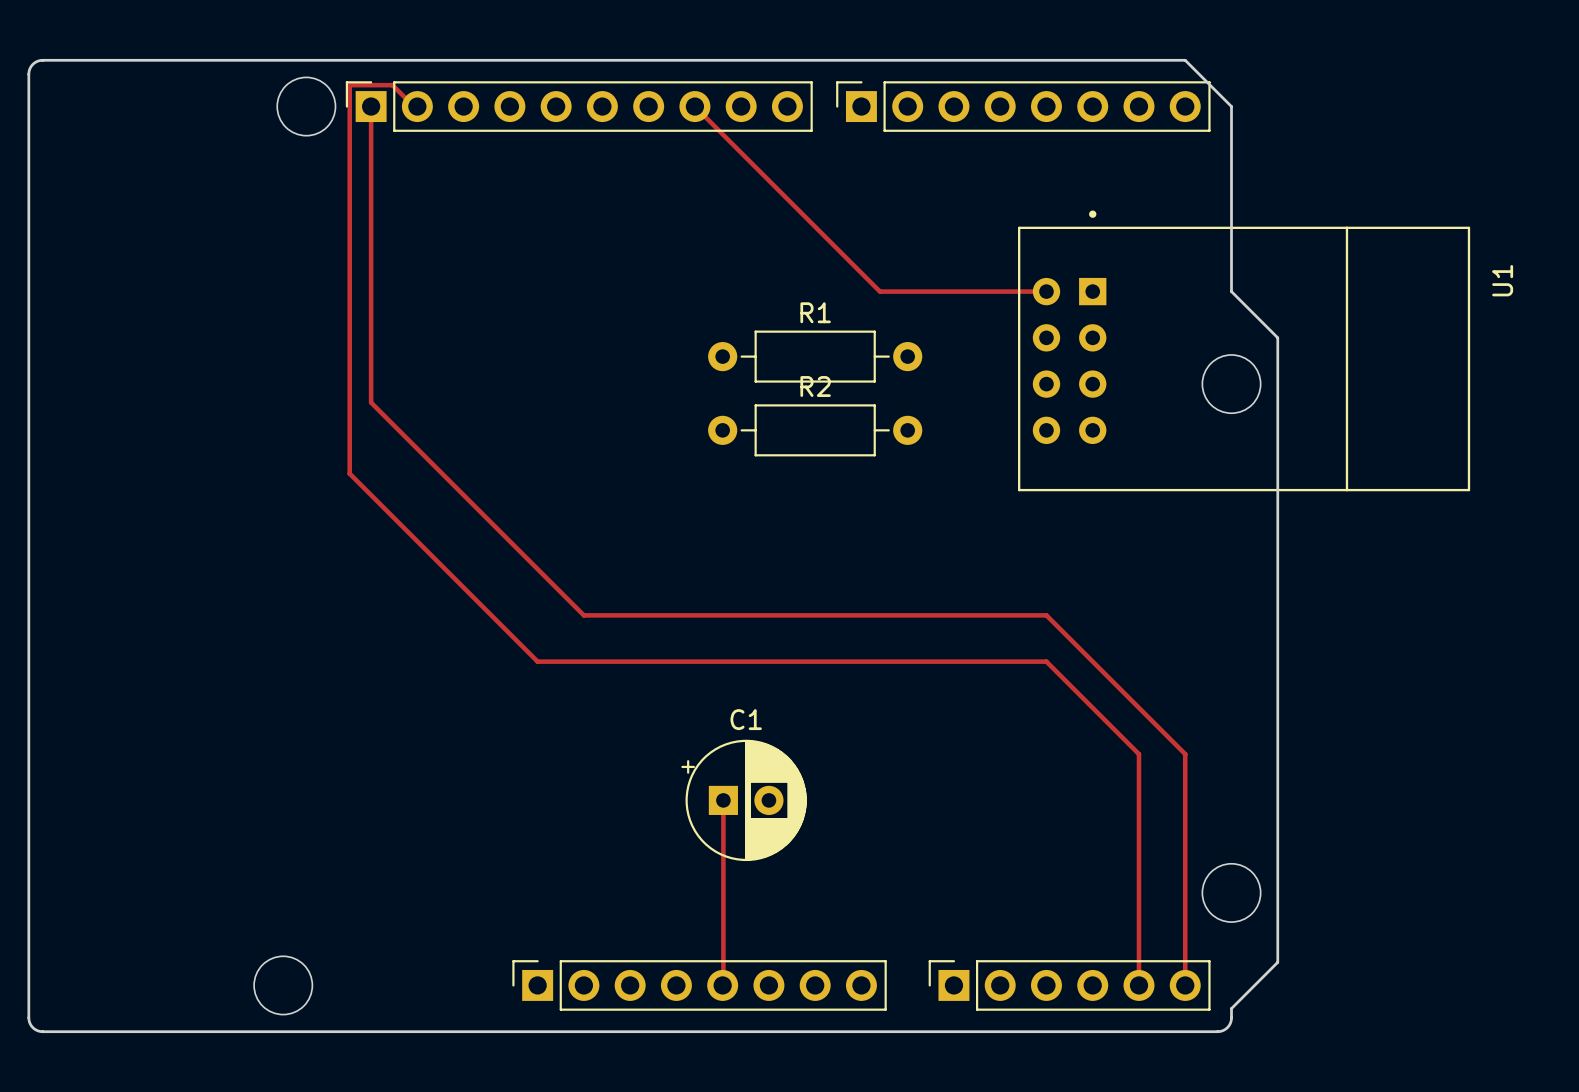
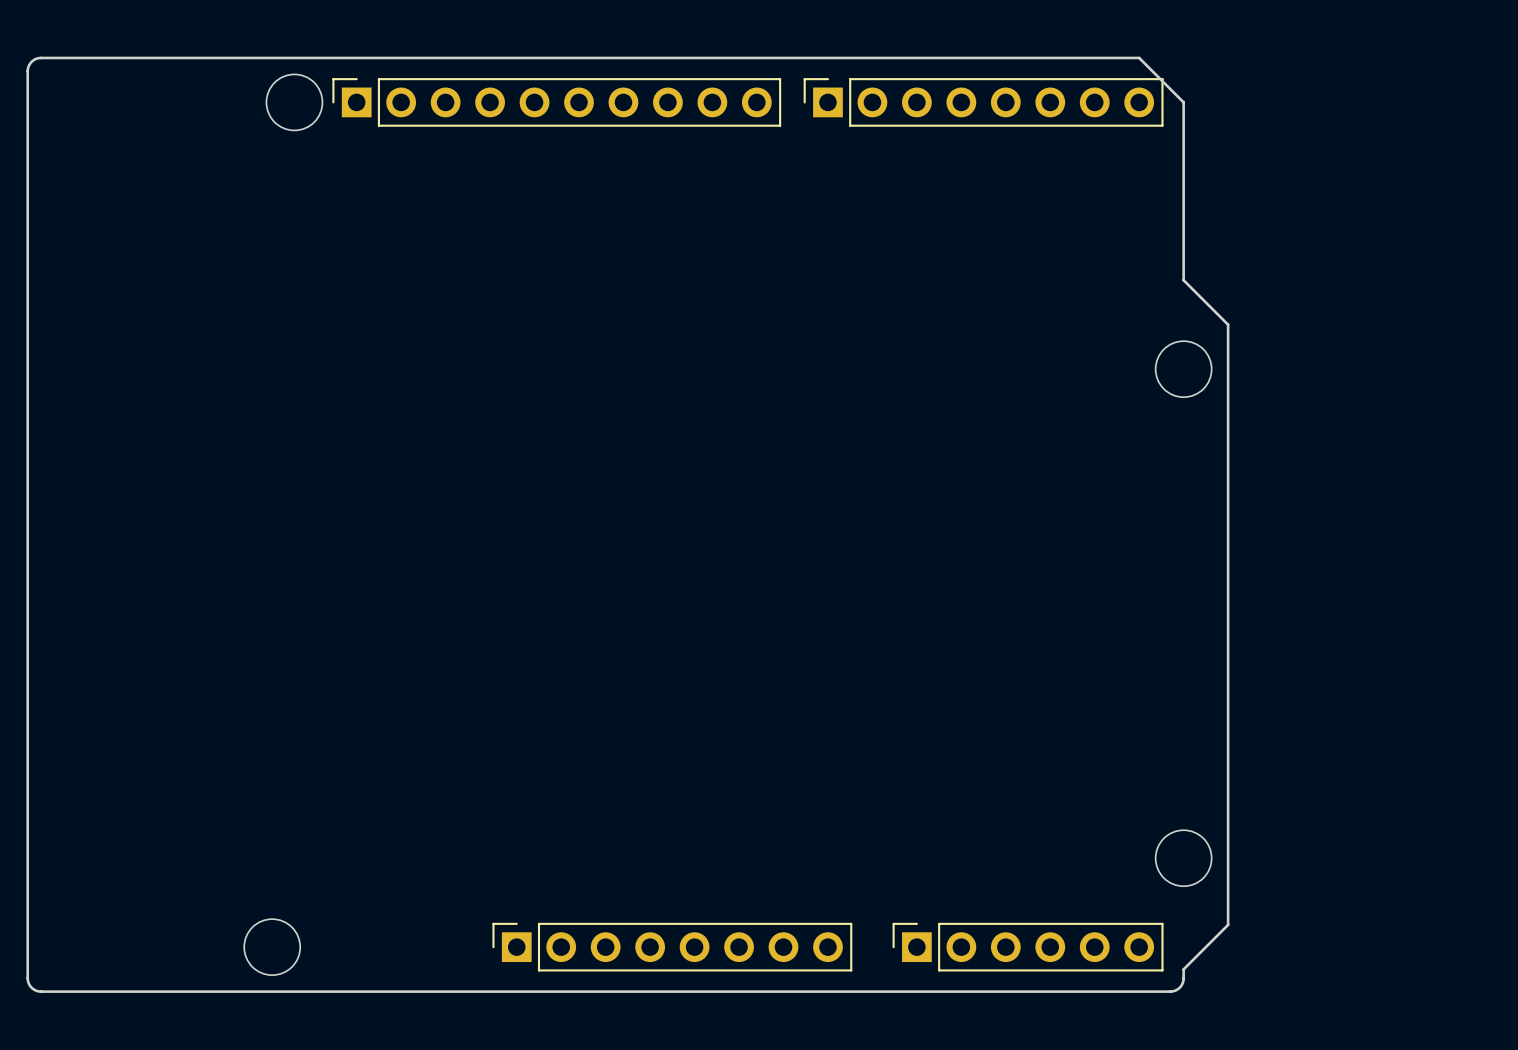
track: (371, 106) (371, 402) (583, 615) (1046, 615) (1185, 754) (1185, 985) -> none
track: (417, 106) (417, 110) (392, 85) (349, 85) (349, 473) (537, 661) (1046, 661) (1138, 754) (1138, 985) -> none
track: (694, 106) (879, 291) (1046, 291) -> none
U1: (1244, 350) -> none
R1: (815, 356) -> none
R2: (815, 430) -> none
track: (723, 800) (722, 985) -> none
C1: (744, 800) -> none

